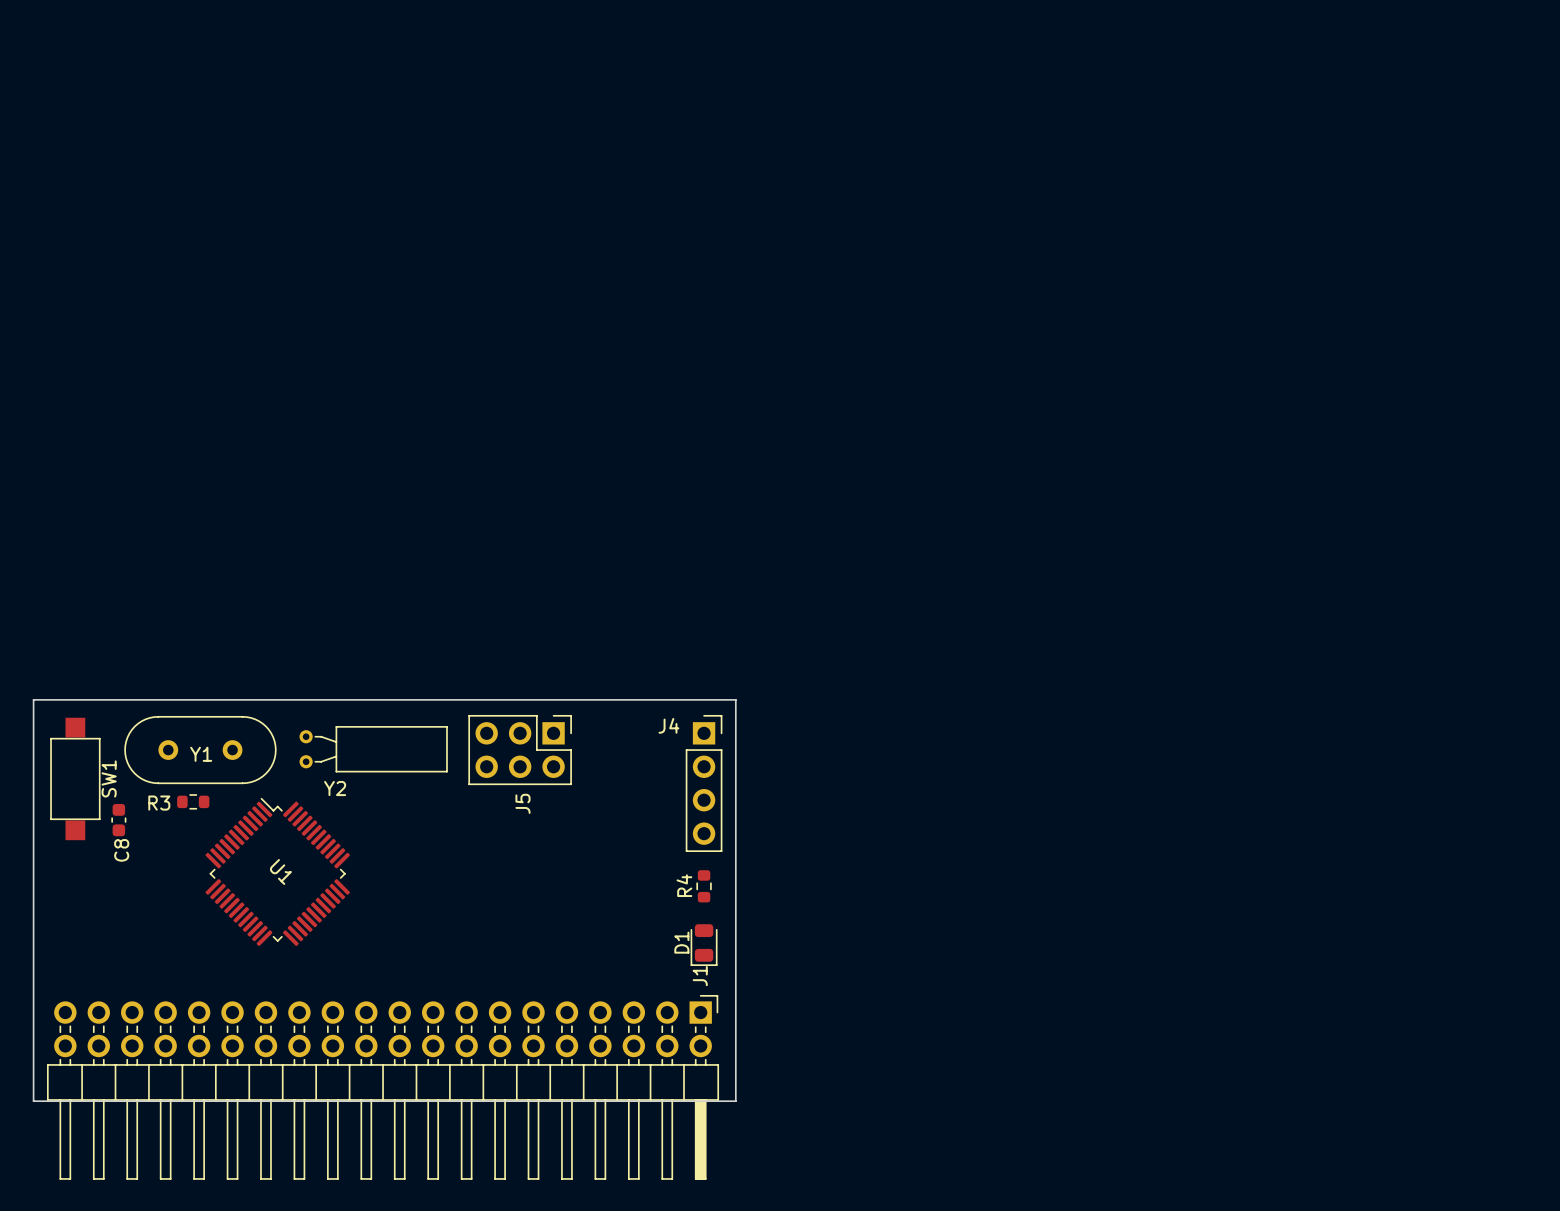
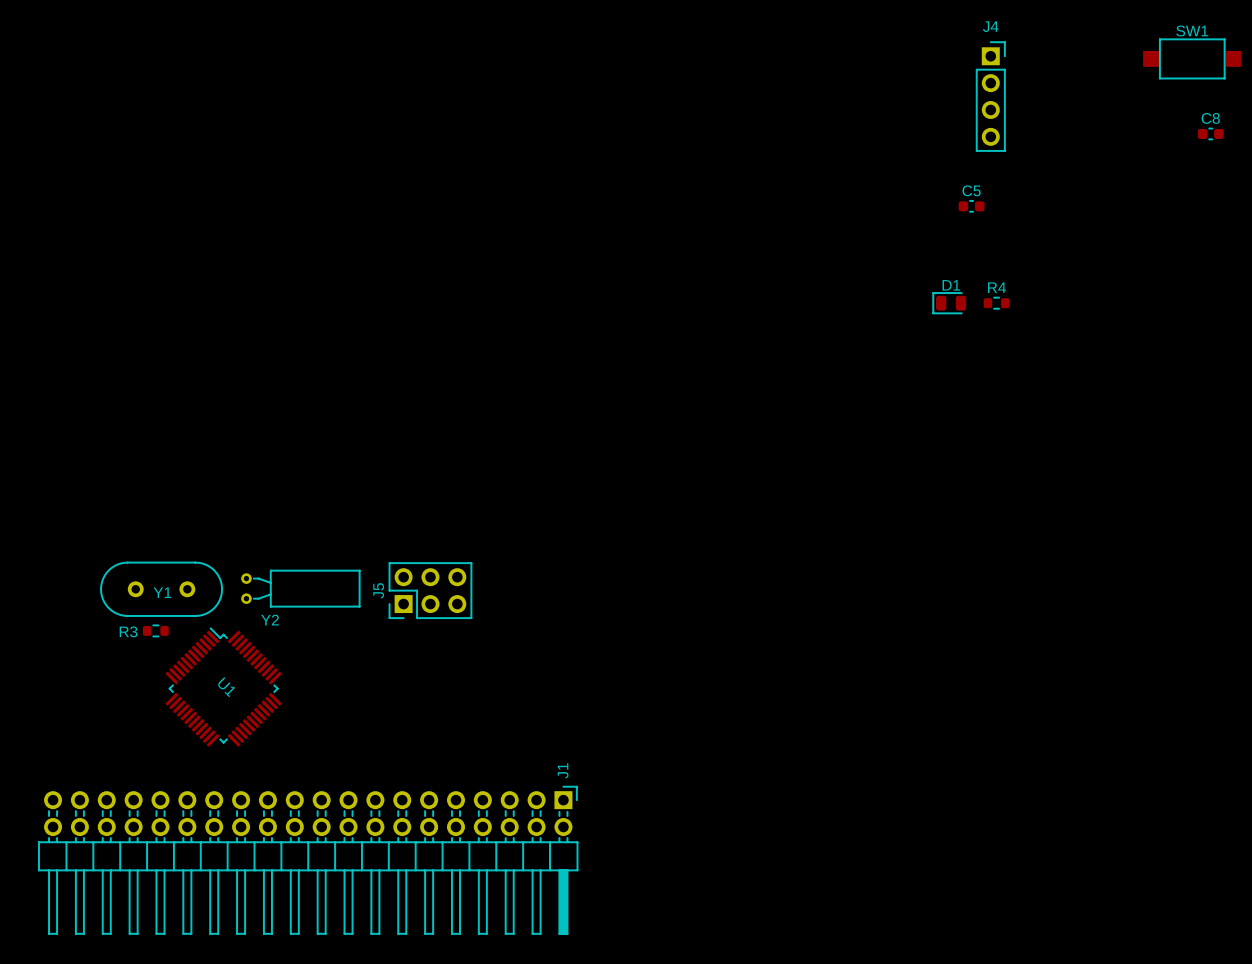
C5: none -> (971, 206)
board edge: (33, 699) (33, 1101) (735, 1101) (735, 699) (33, 699) -> none
J4 name position: J4 (668, 725) -> J4 (990, 26)
J5 rotation: 0° (520, 750) -> 180° (430, 590)
SW1 rotation: 0° (75, 778) -> 90° clockwise (1192, 58)
SW1 position: (75, 778) -> (1192, 58)
SW1 name position: SW1 (109, 778) -> SW1 (1192, 31)
J4 position: (704, 783) -> (990, 96)
J5 name position: J5 (522, 803) -> J5 (378, 590)
C8 rotation: 0° (118, 820) -> 90° clockwise (1210, 133)
C8 position: (118, 820) -> (1210, 133)
C8 name position: C8 (121, 850) -> C8 (1210, 118)
R4 rotation: 0° (704, 886) -> 90° clockwise (996, 303)
R4 position: (704, 886) -> (996, 303)
D1 rotation: 0° (704, 945) -> 90° clockwise (949, 303)
D1 position: (704, 945) -> (949, 303)

